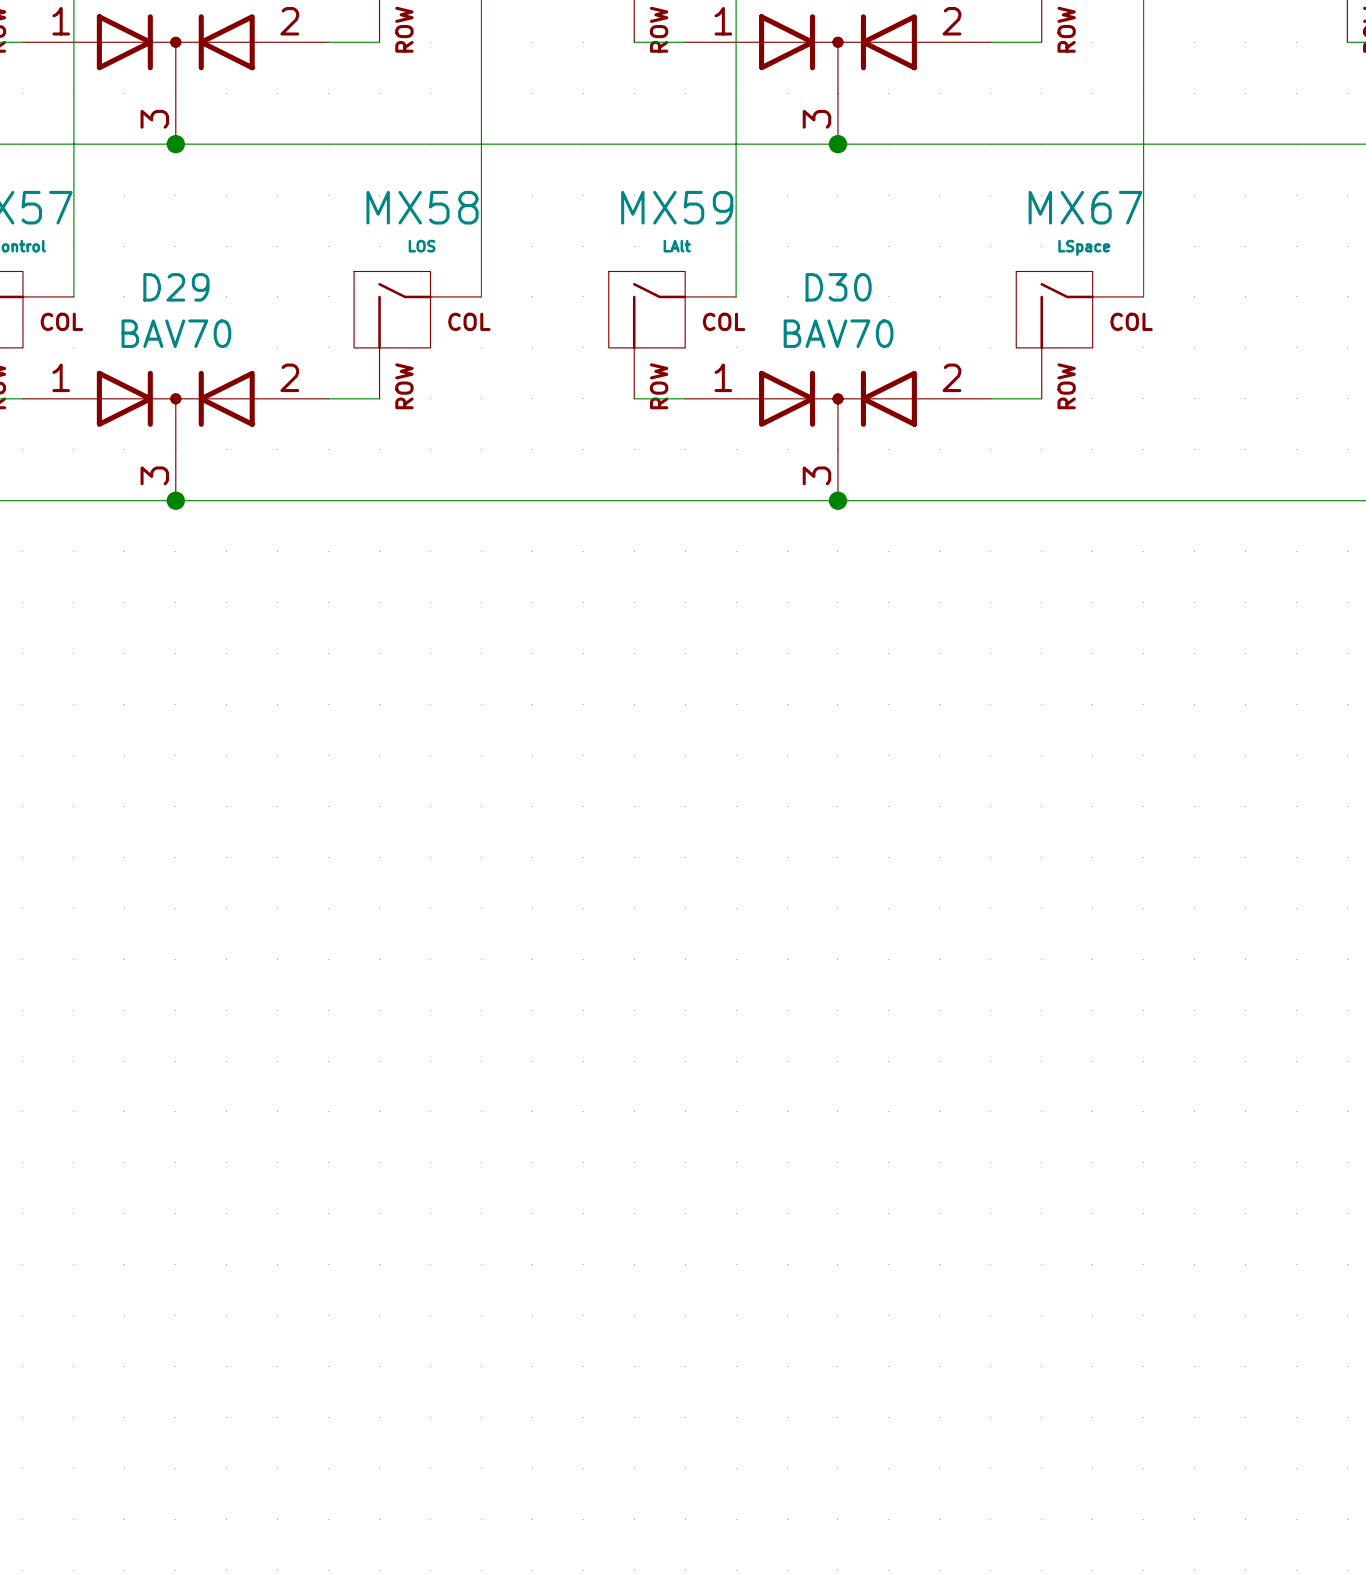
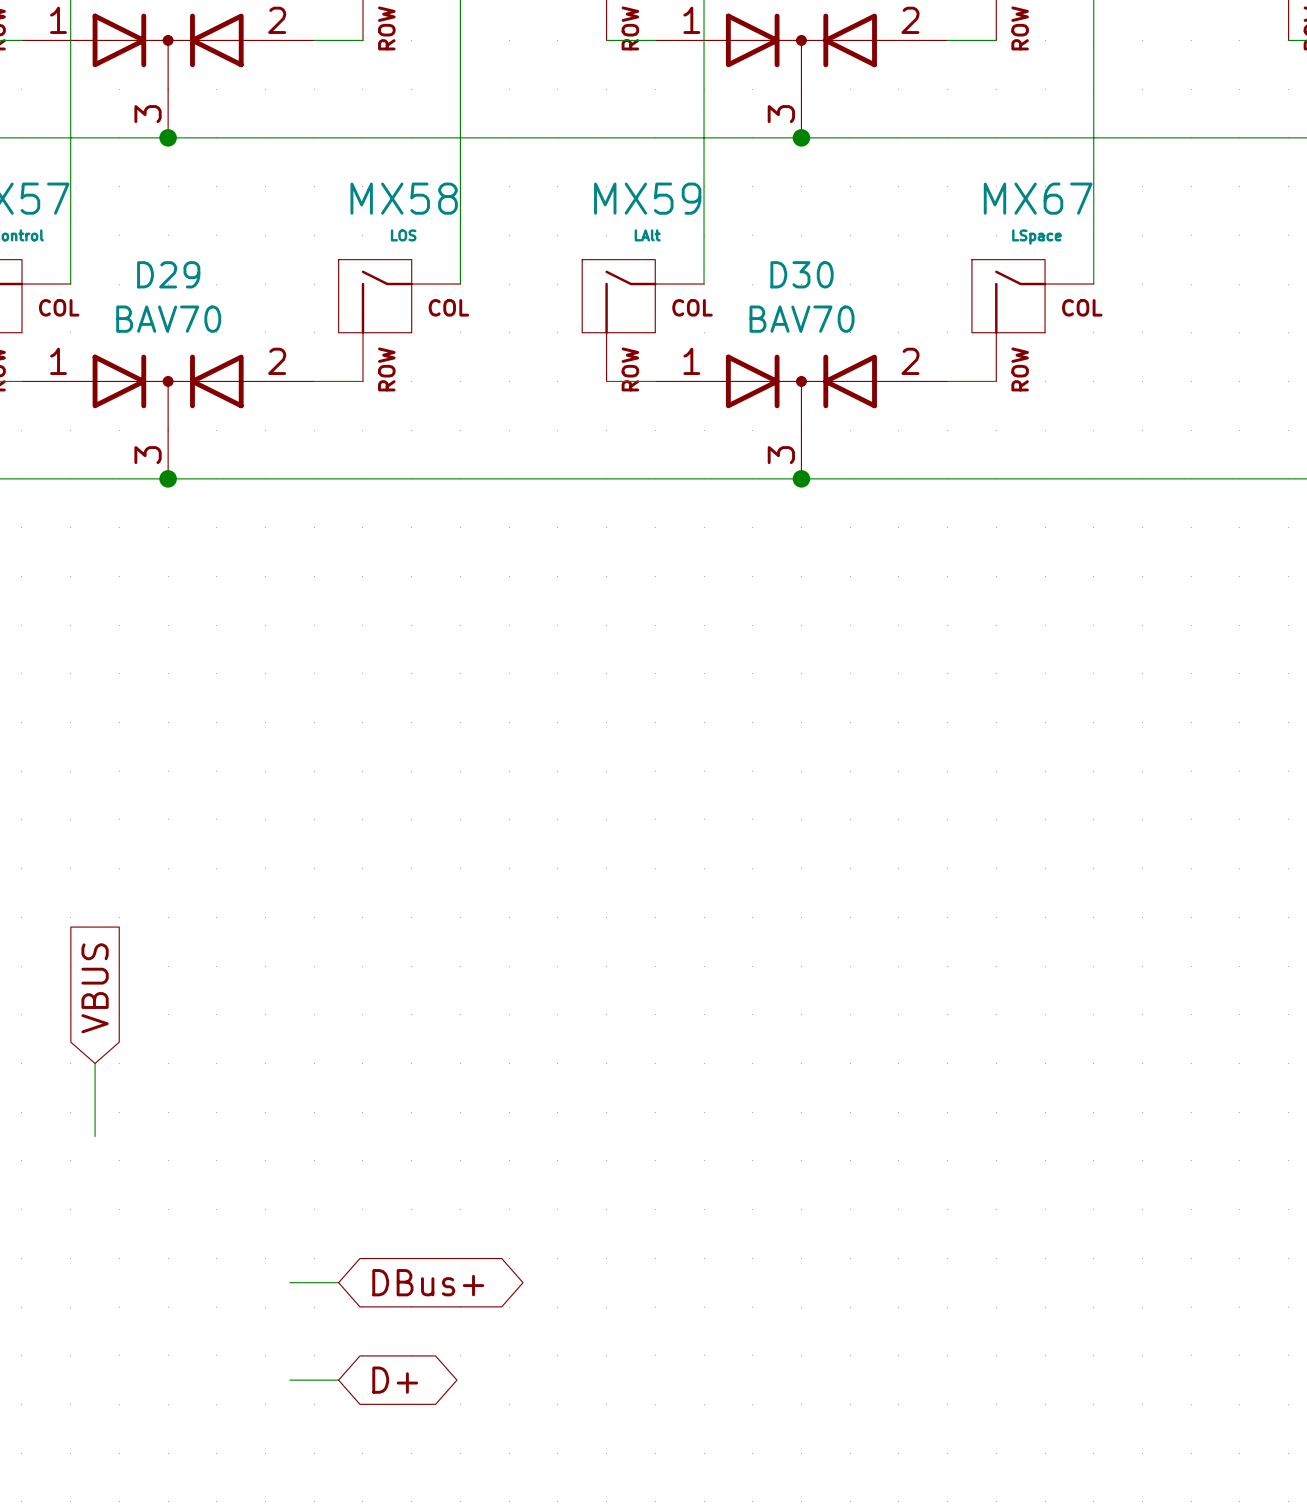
global label: none -> VBUS (95, 988)
wire: none -> (95, 1063) (95, 1136)
wire: none -> (289, 1282) (338, 1282)
global label: none -> DBus+ (428, 1282)
wire: none -> (289, 1380) (338, 1380)
global label: none -> D+ (395, 1380)

